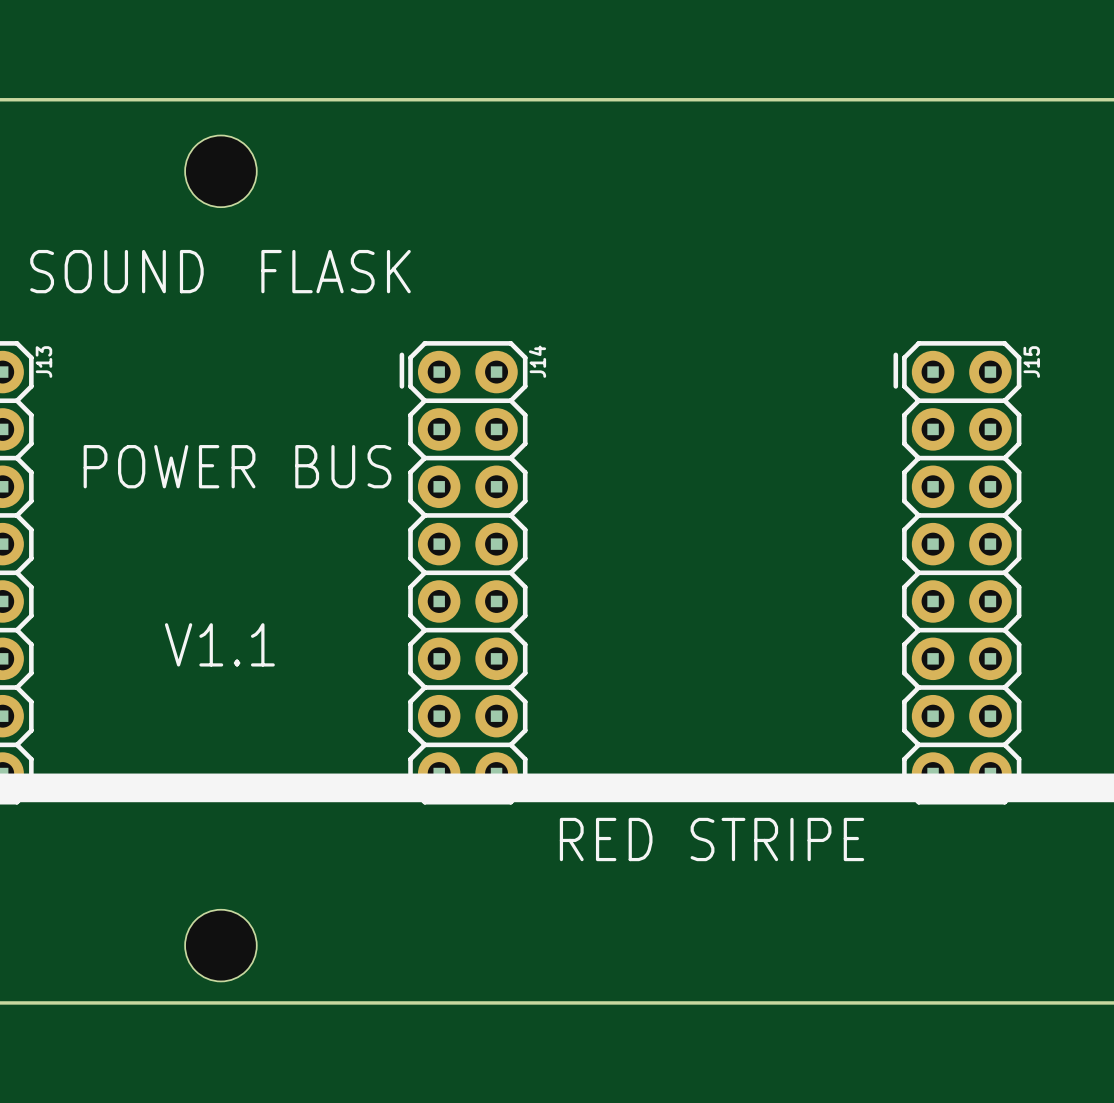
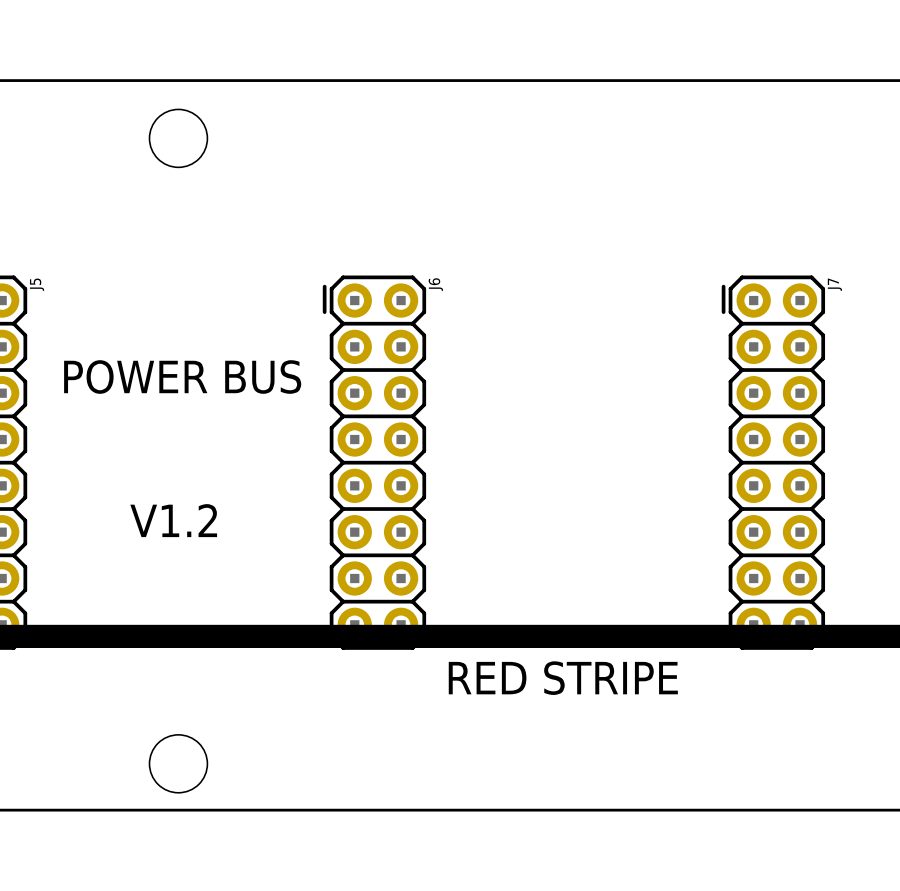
text: SOUND (116, 271) -> none
text: FLASK (336, 271) -> none
J14 name: J14 (537, 361) -> J6 (435, 284)
J13 name: J13 (43, 362) -> J5 (37, 284)
J15 name: J15 (1031, 362) -> J7 (834, 284)
text: V1.1 (219, 644) -> V1.2 (173, 520)

